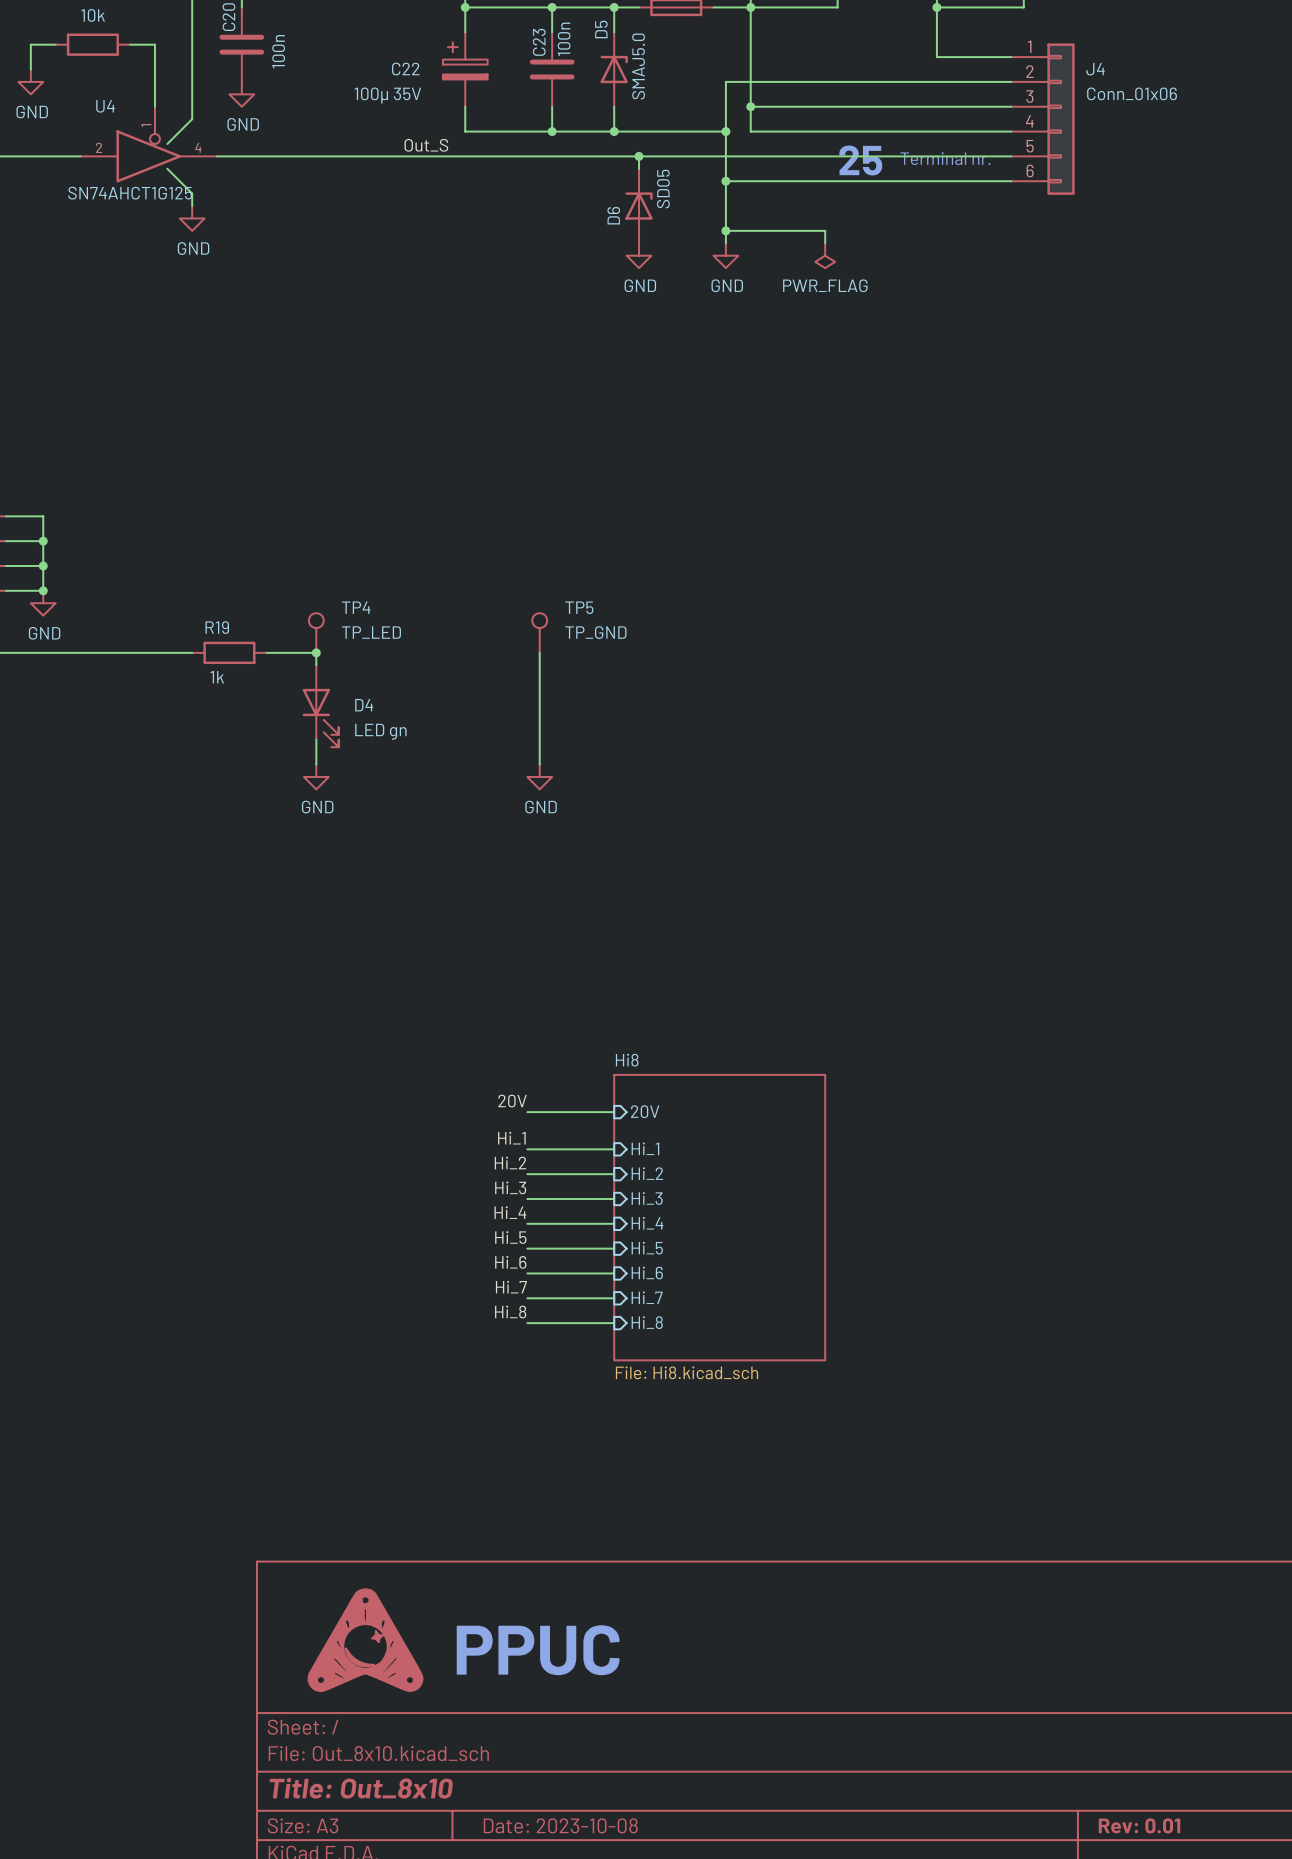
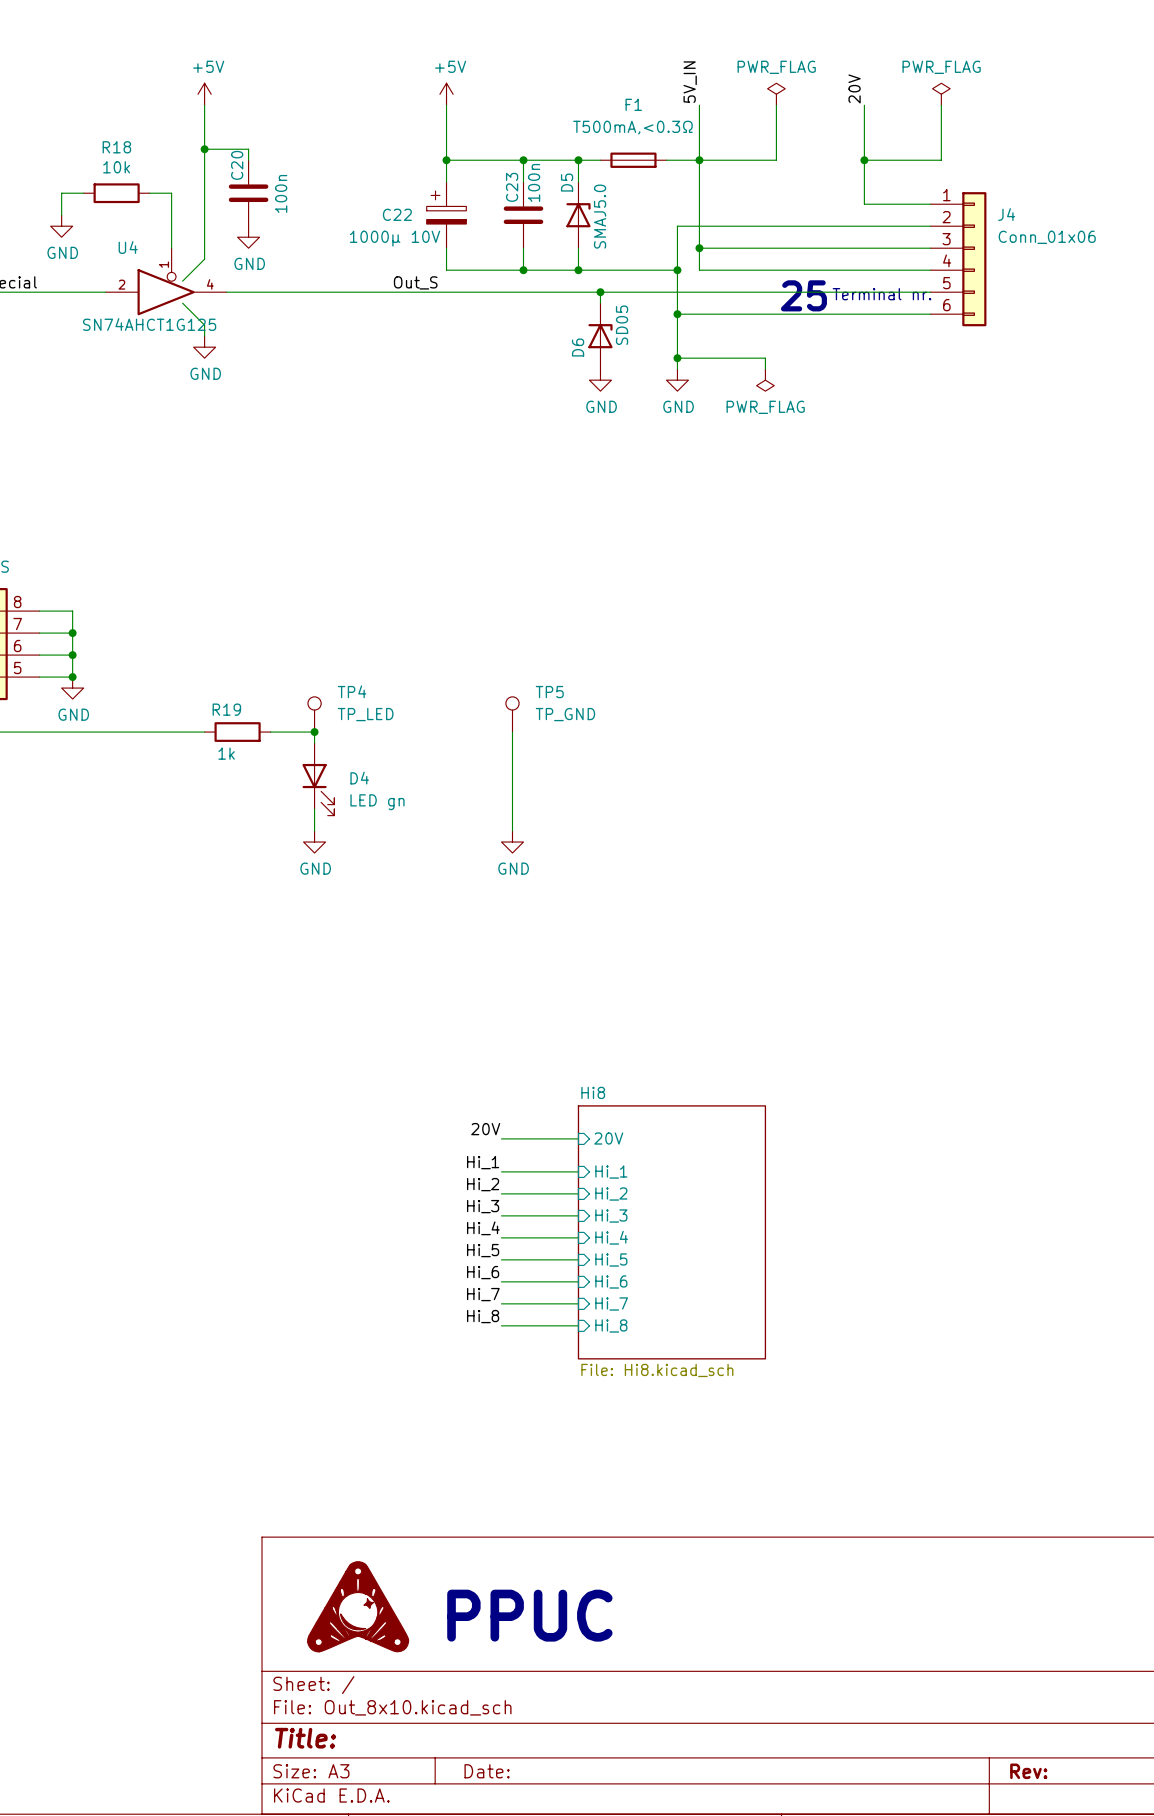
C22 value: 100µ 35V (387, 95) -> 1000µ 10V (395, 238)
title block: Title: Out_8x10 (361, 1788) -> Title: (305, 1738)
title block: Date: 2023-10-08 (560, 1825) -> Date: (487, 1771)
title block: Rev: 0.01 (1139, 1825) -> Rev: (1028, 1771)

